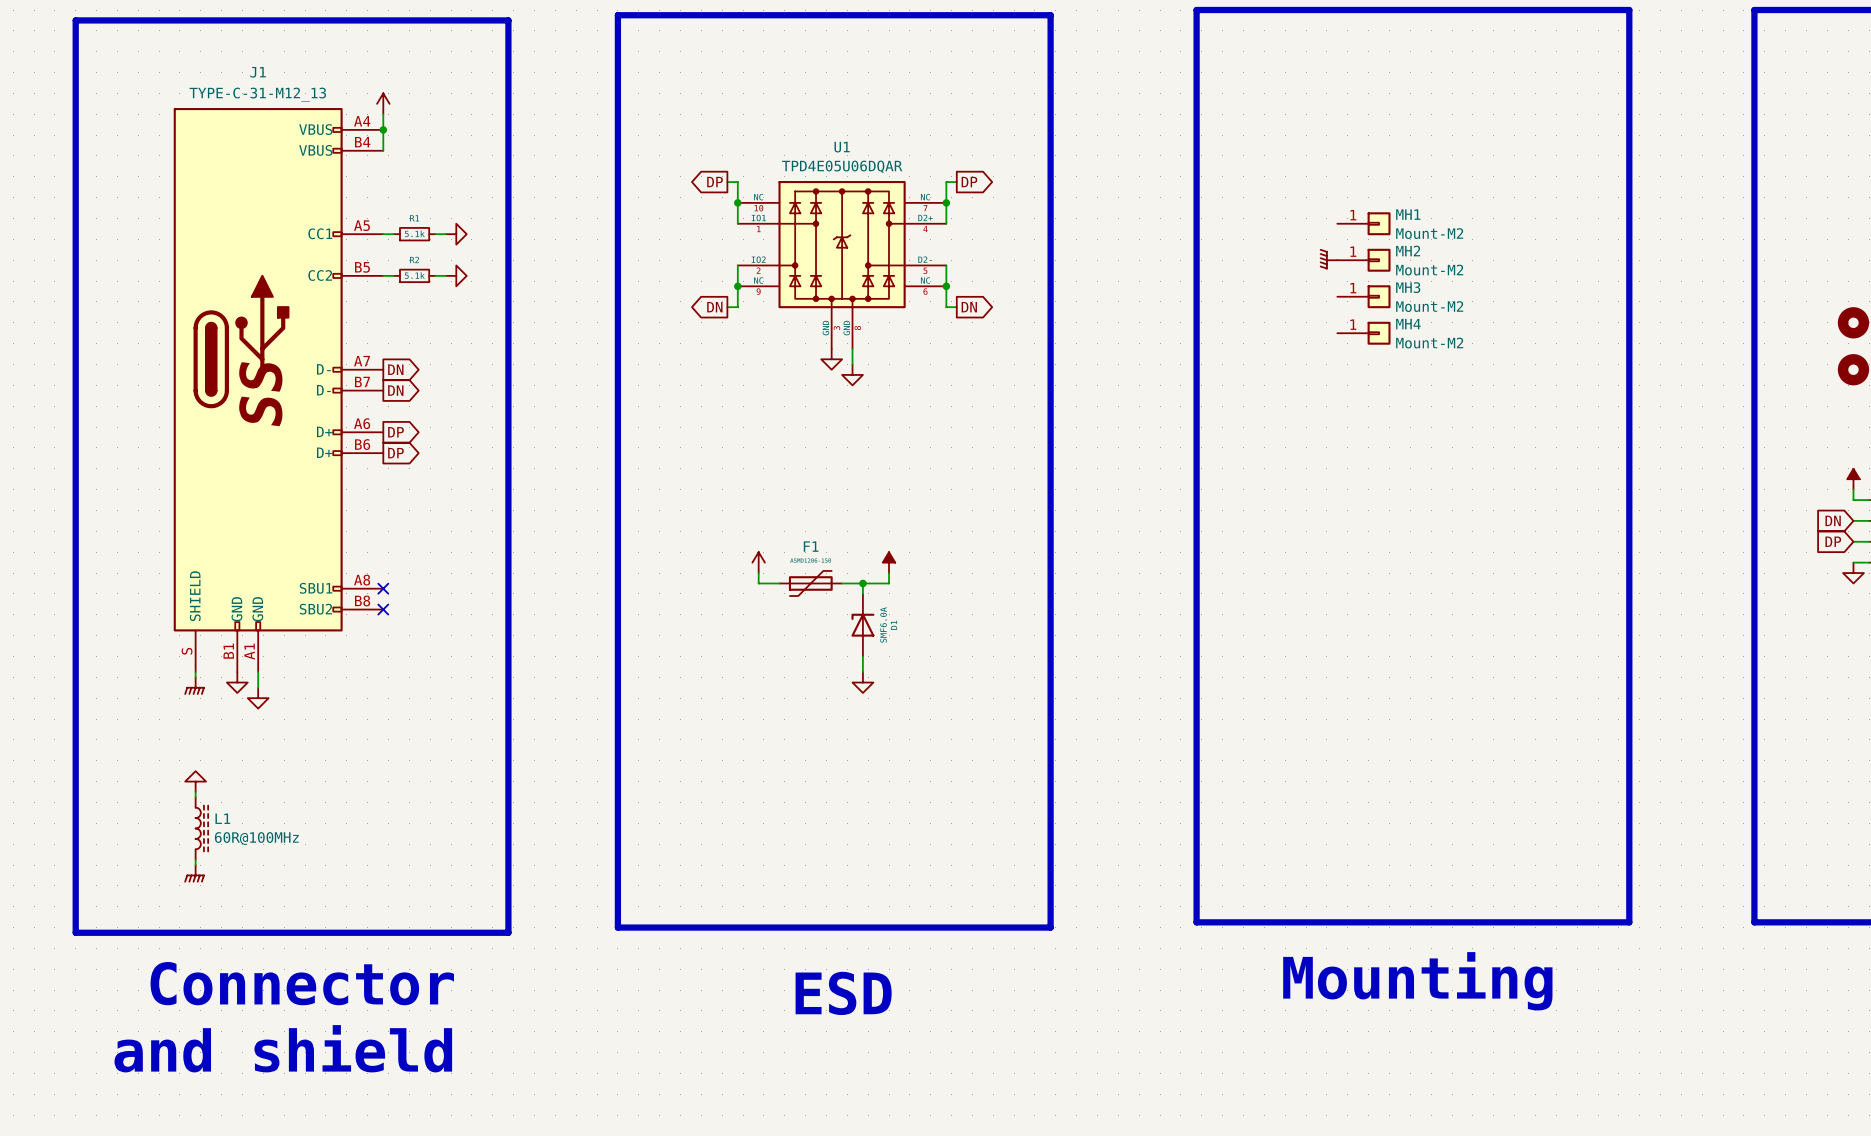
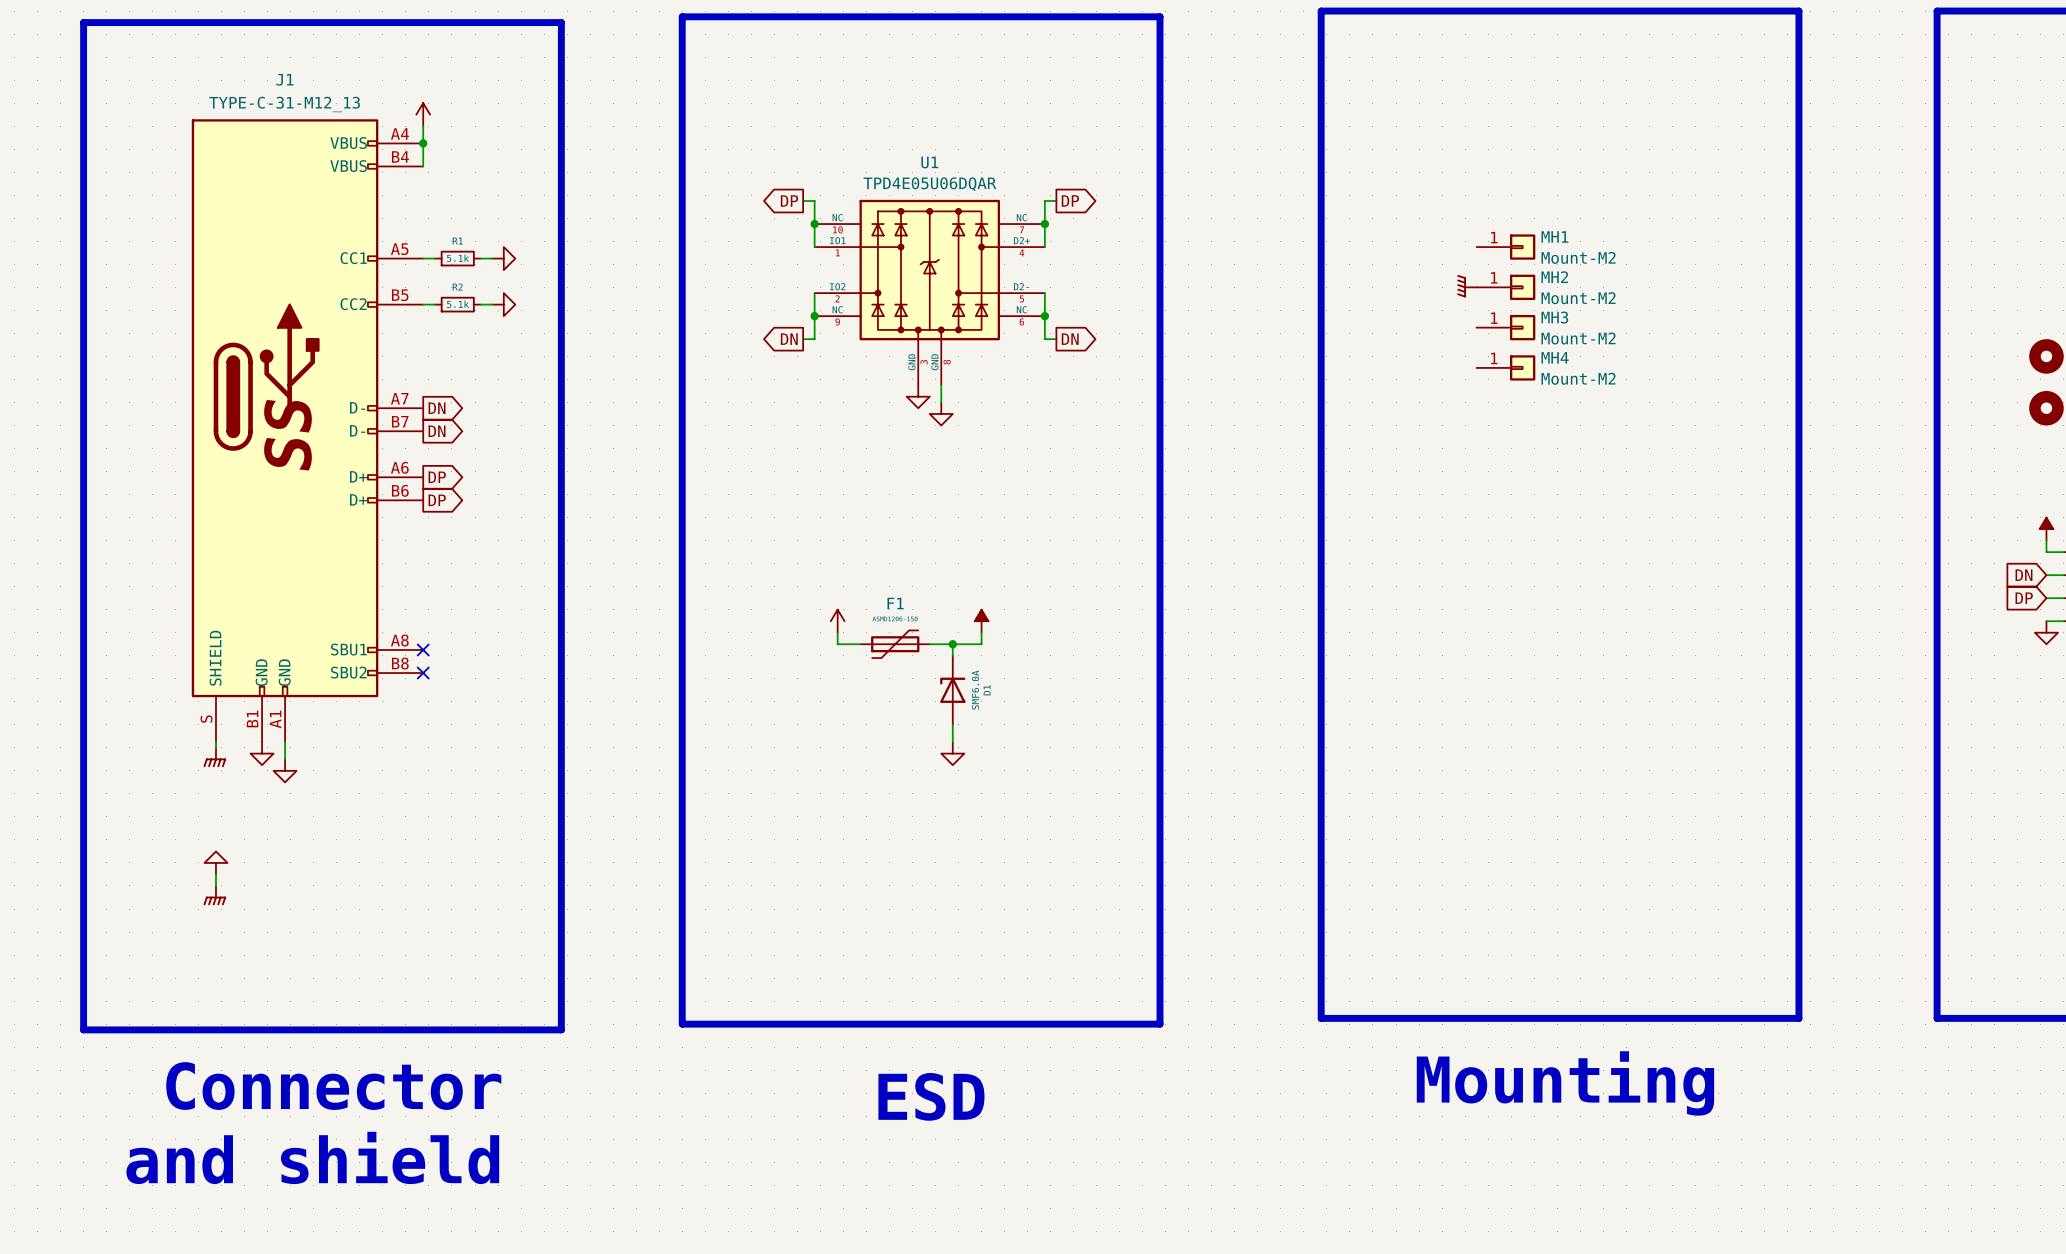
L1: 60R@100MHz (201, 828) -> none
power symbol position: (194, 873) -> (214, 895)

